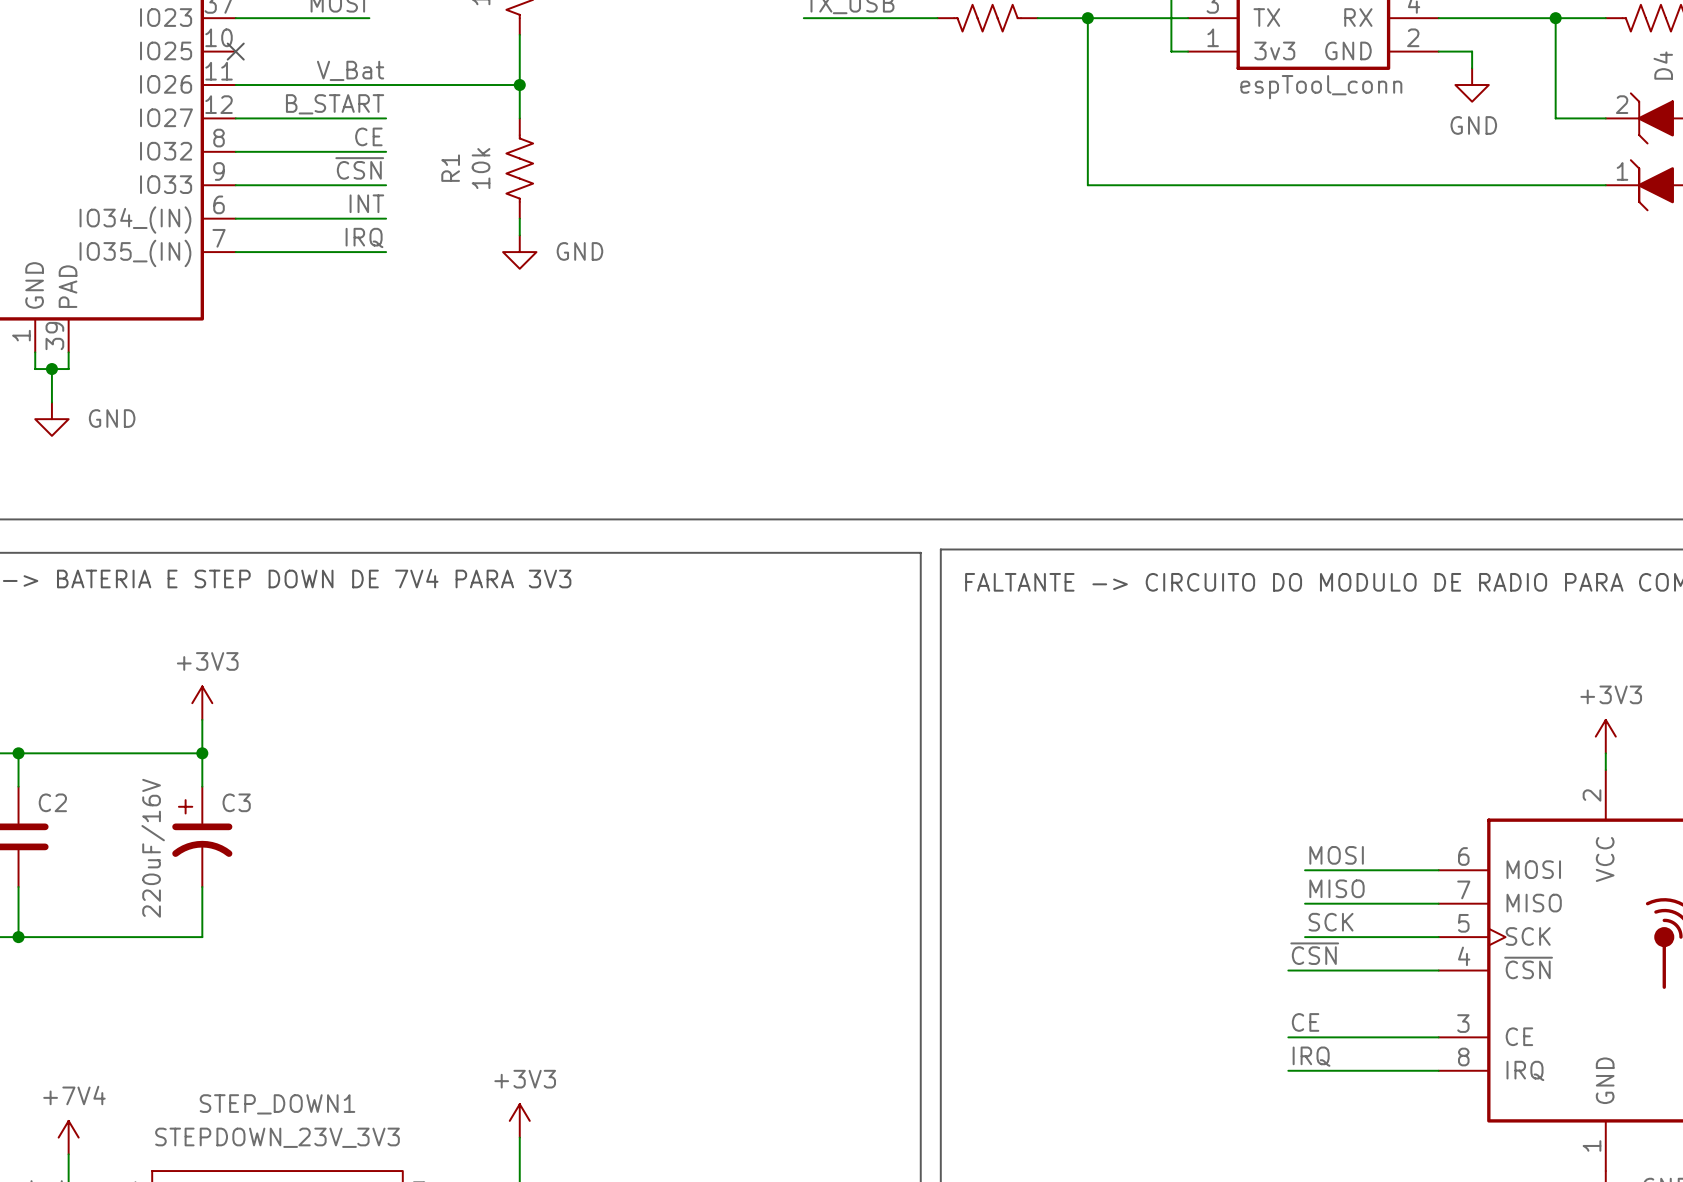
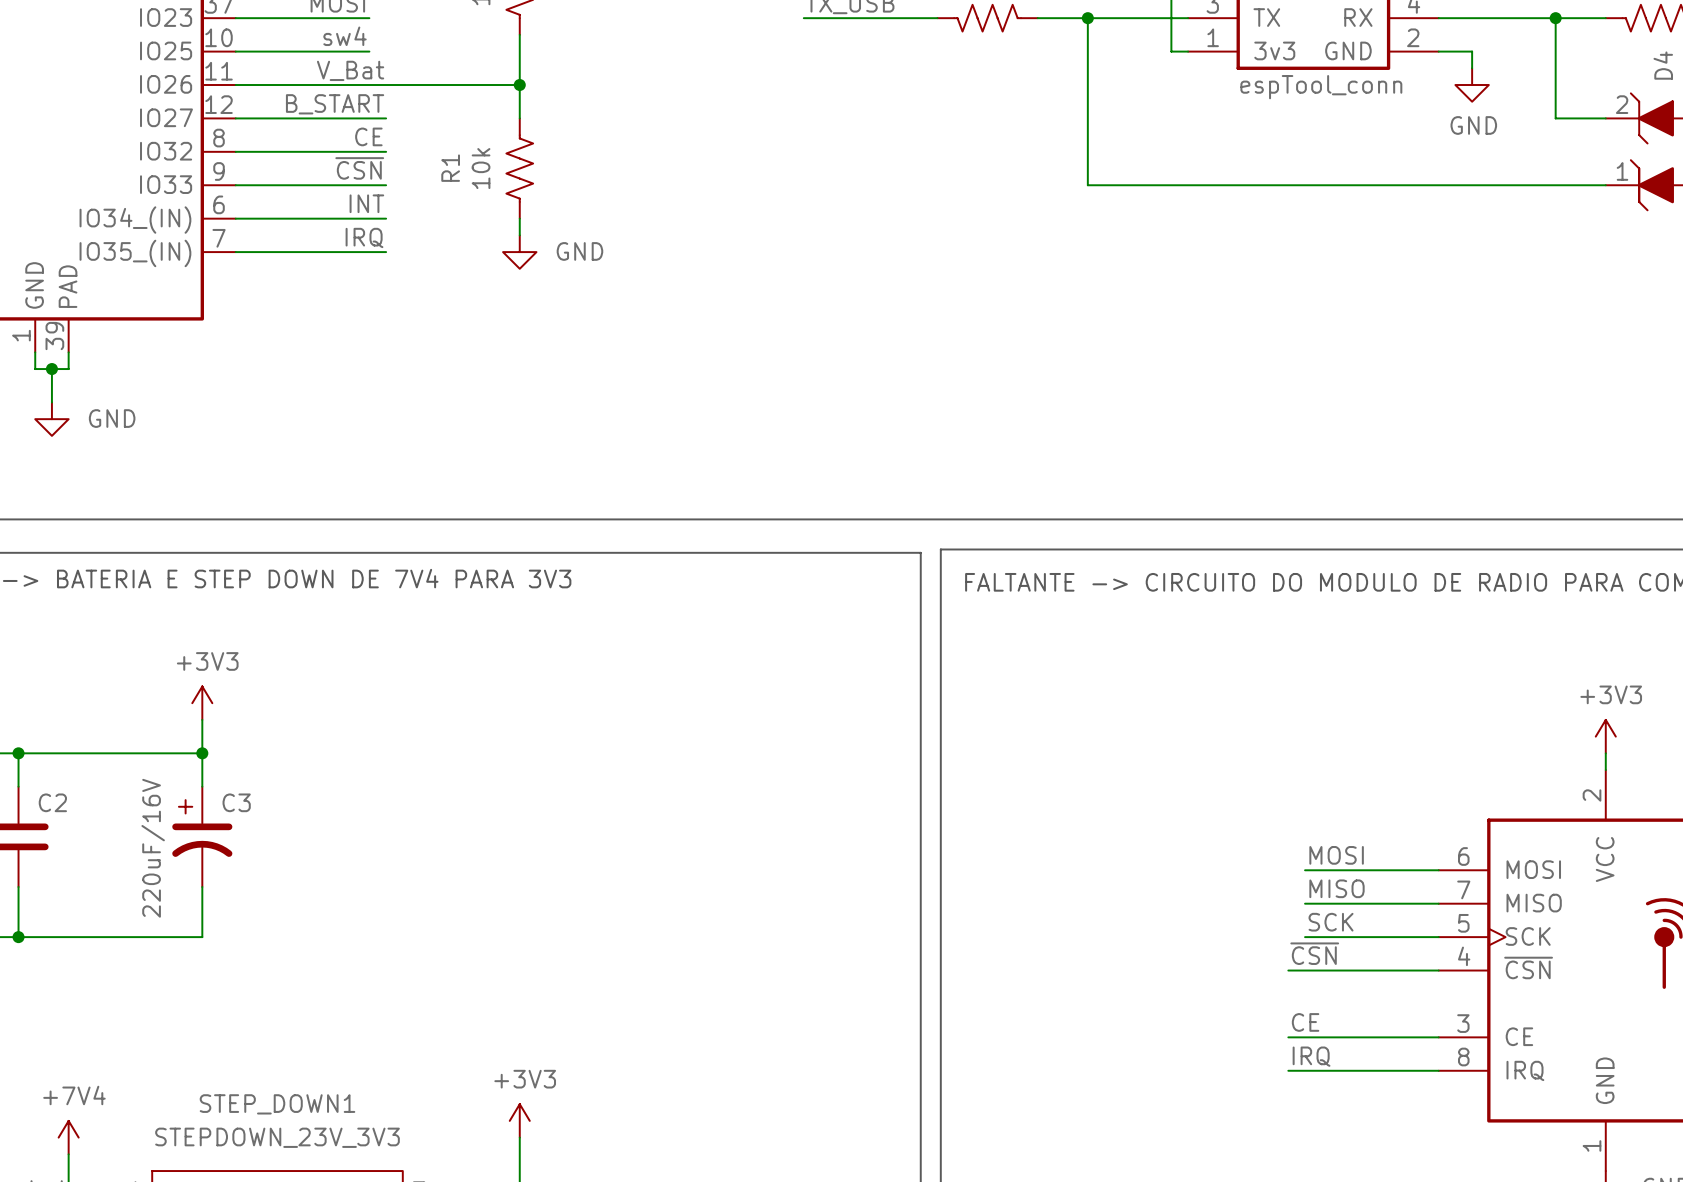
label: none -> sw4 (345, 36)
wire: none -> (235, 51) (369, 51)
no-connect mark: (235, 51) -> none

